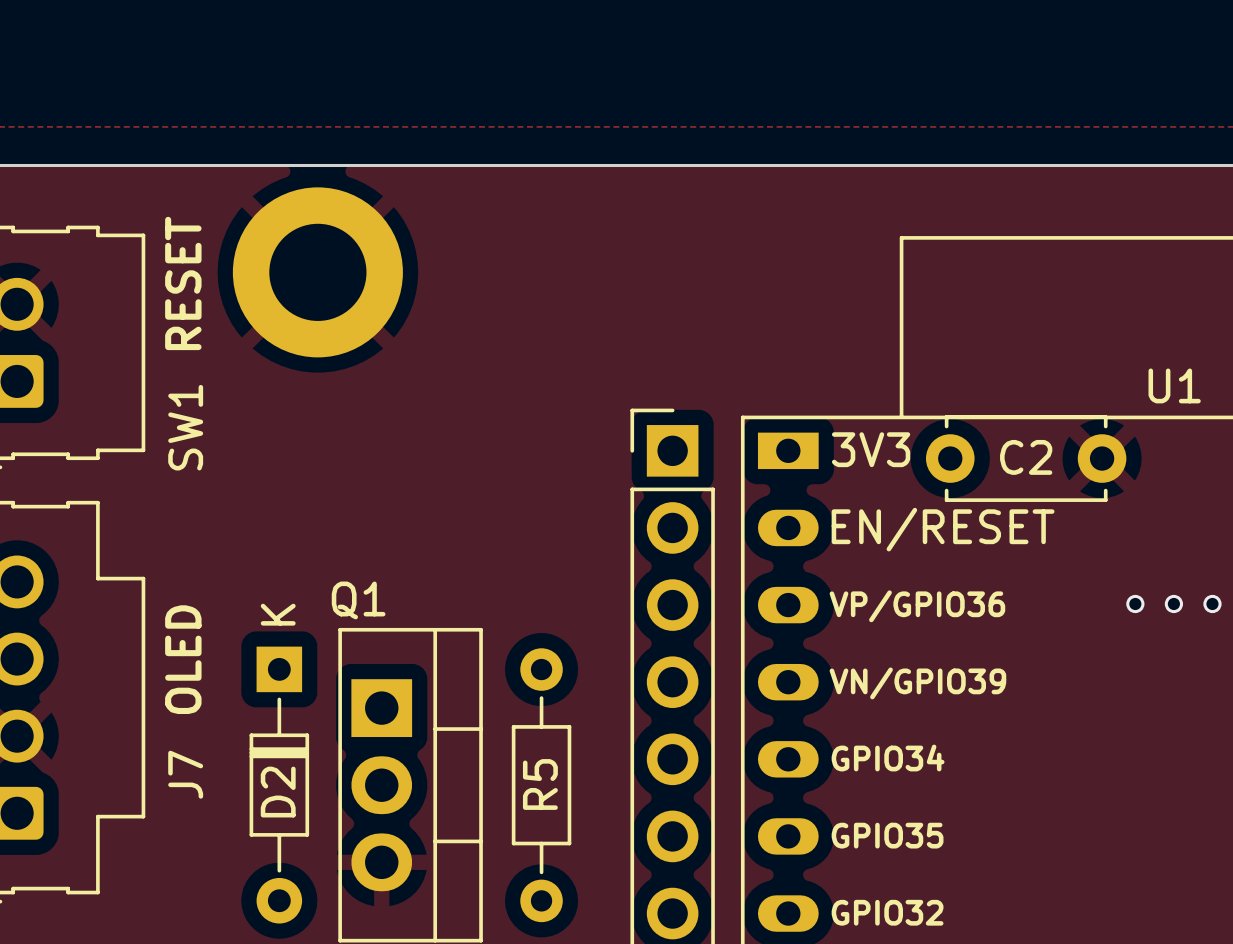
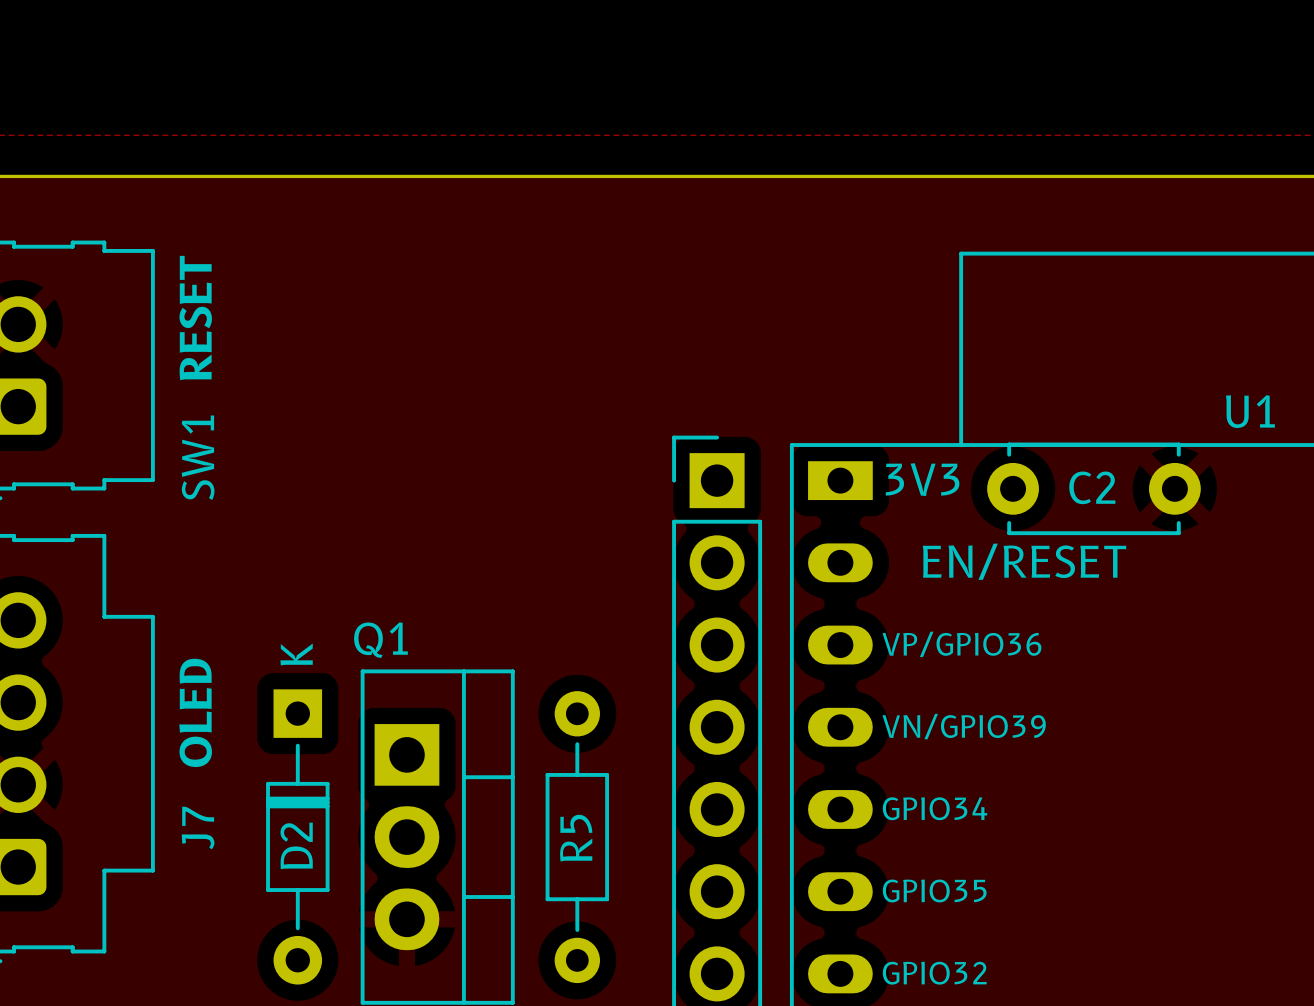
part: (317, 272) -> none
via: (1135, 603) -> none
via: (1173, 603) -> none
via: (1212, 603) -> none

